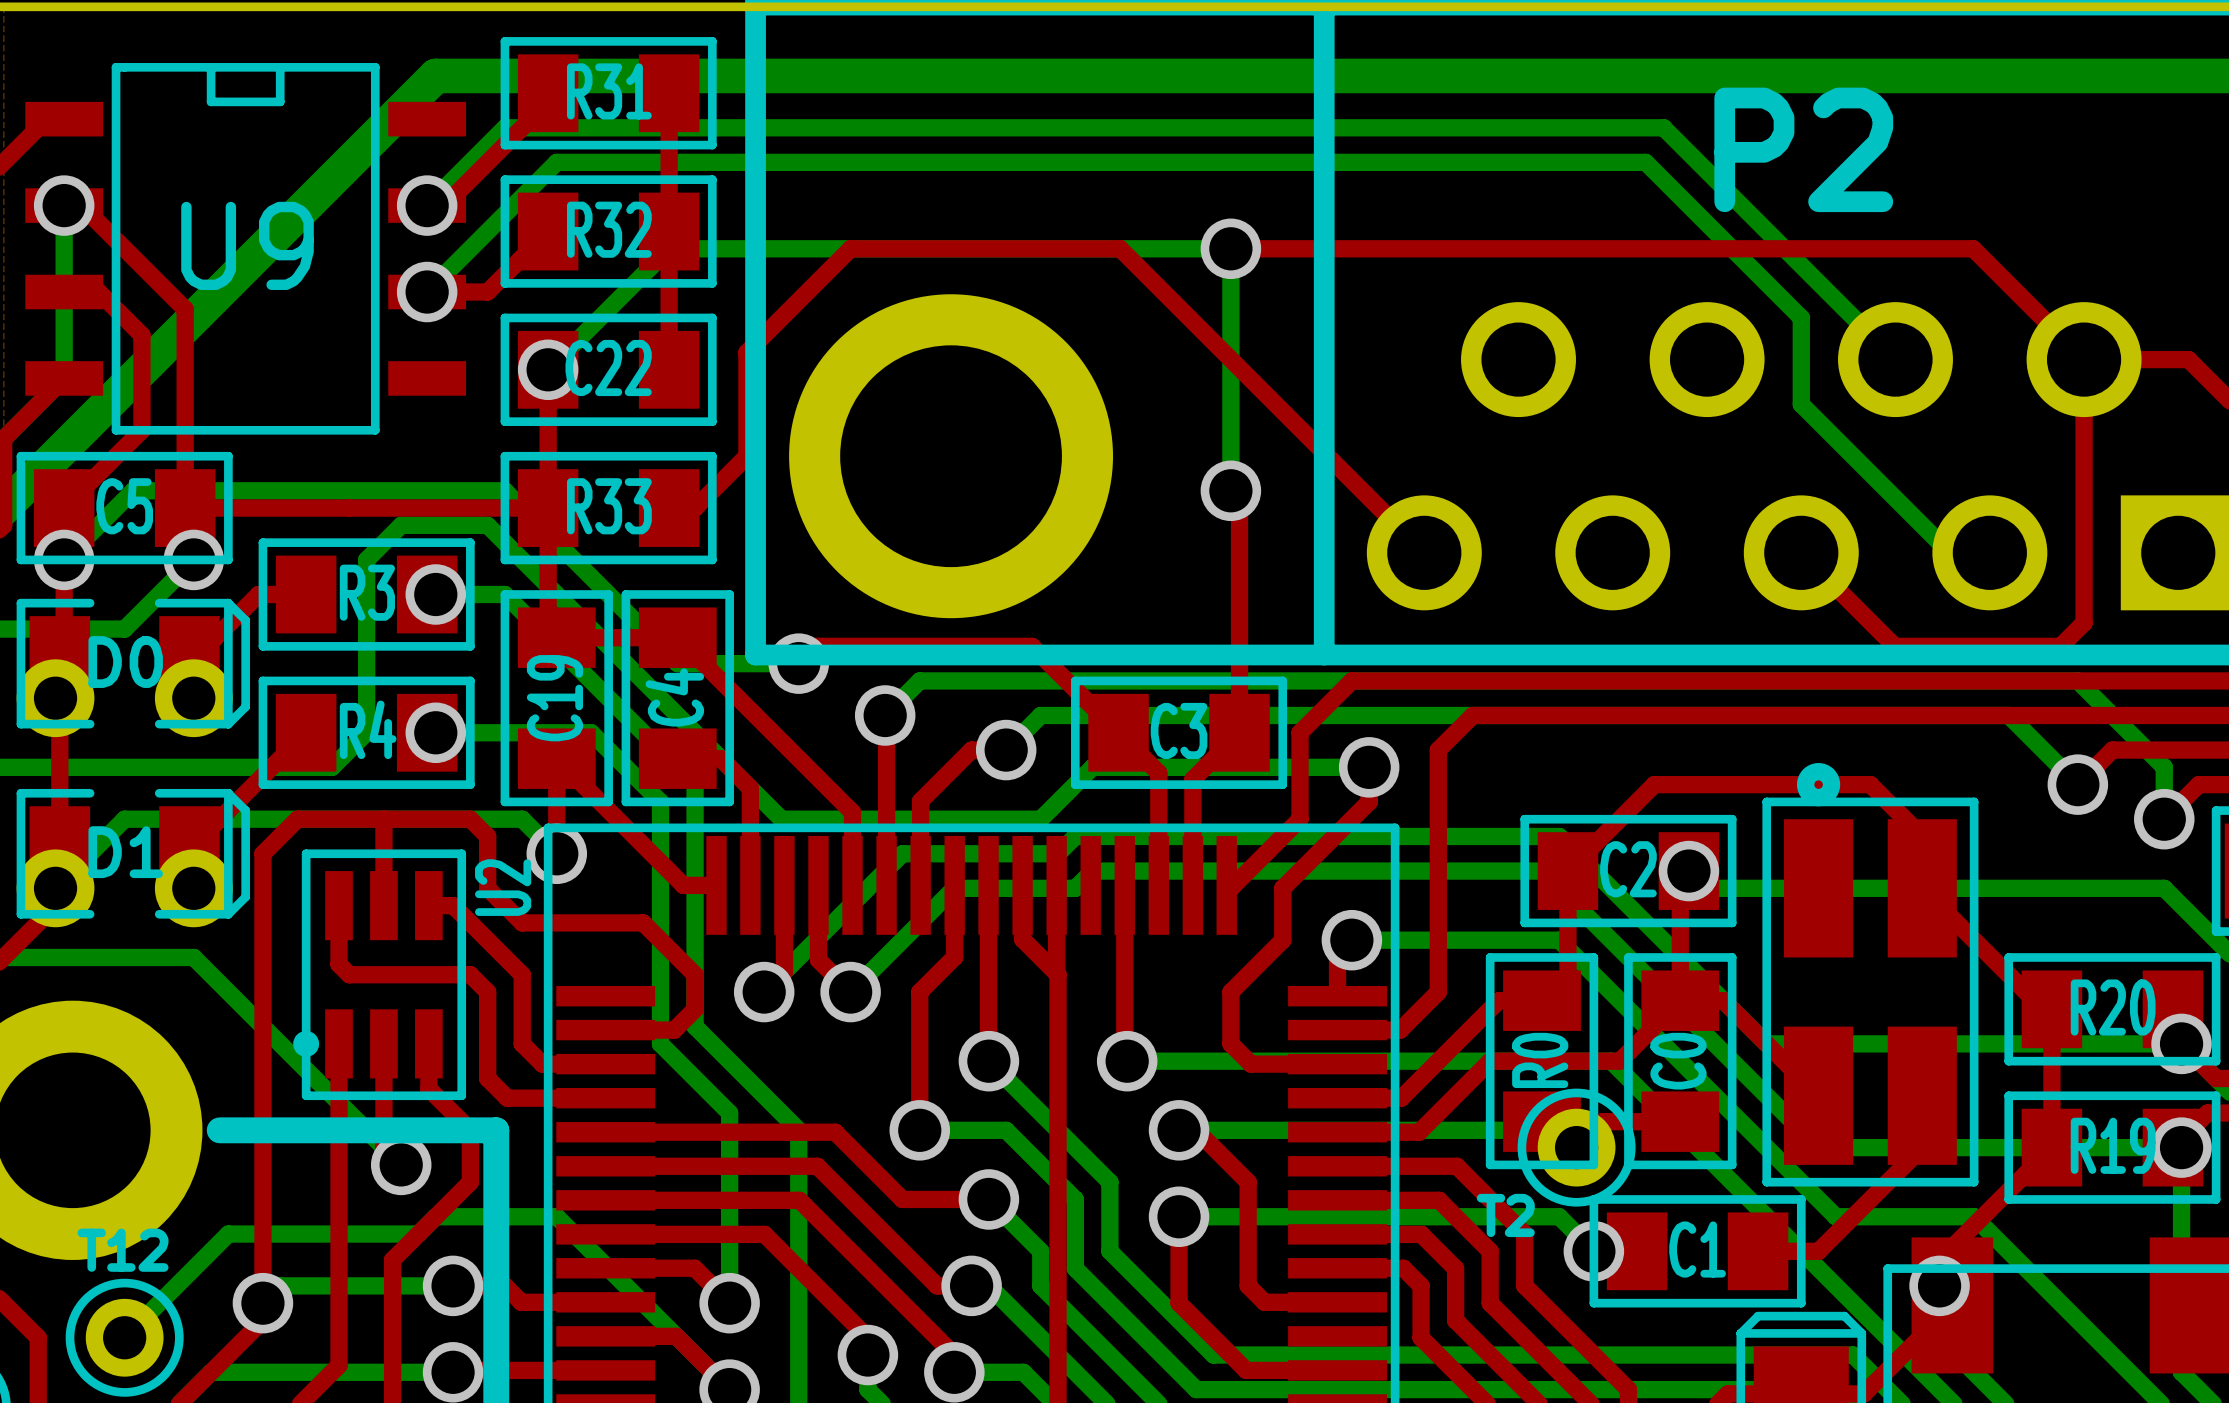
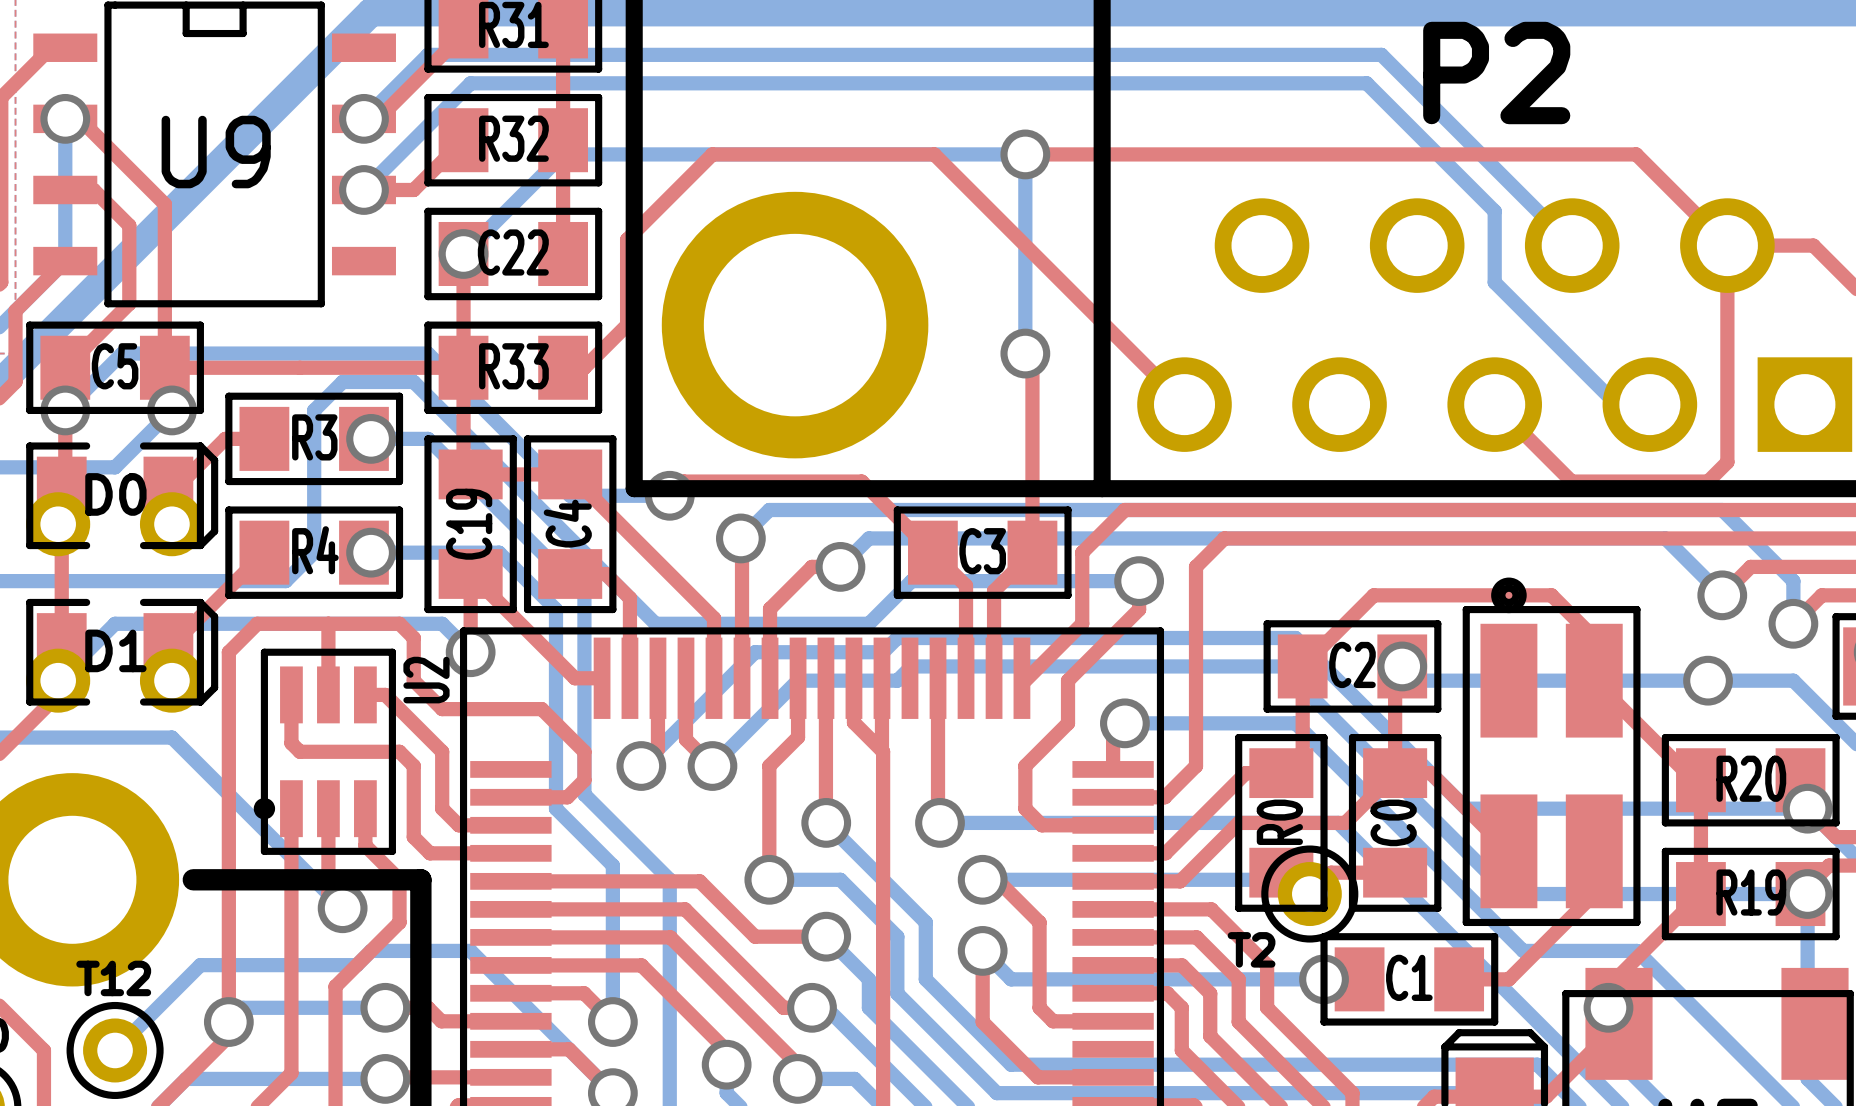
via: none -> (1708, 680)
bottom track: (1179, 1216) (1559, 1216) (1593, 1251) -> (982, 950) (1011, 979) (1324, 979)

